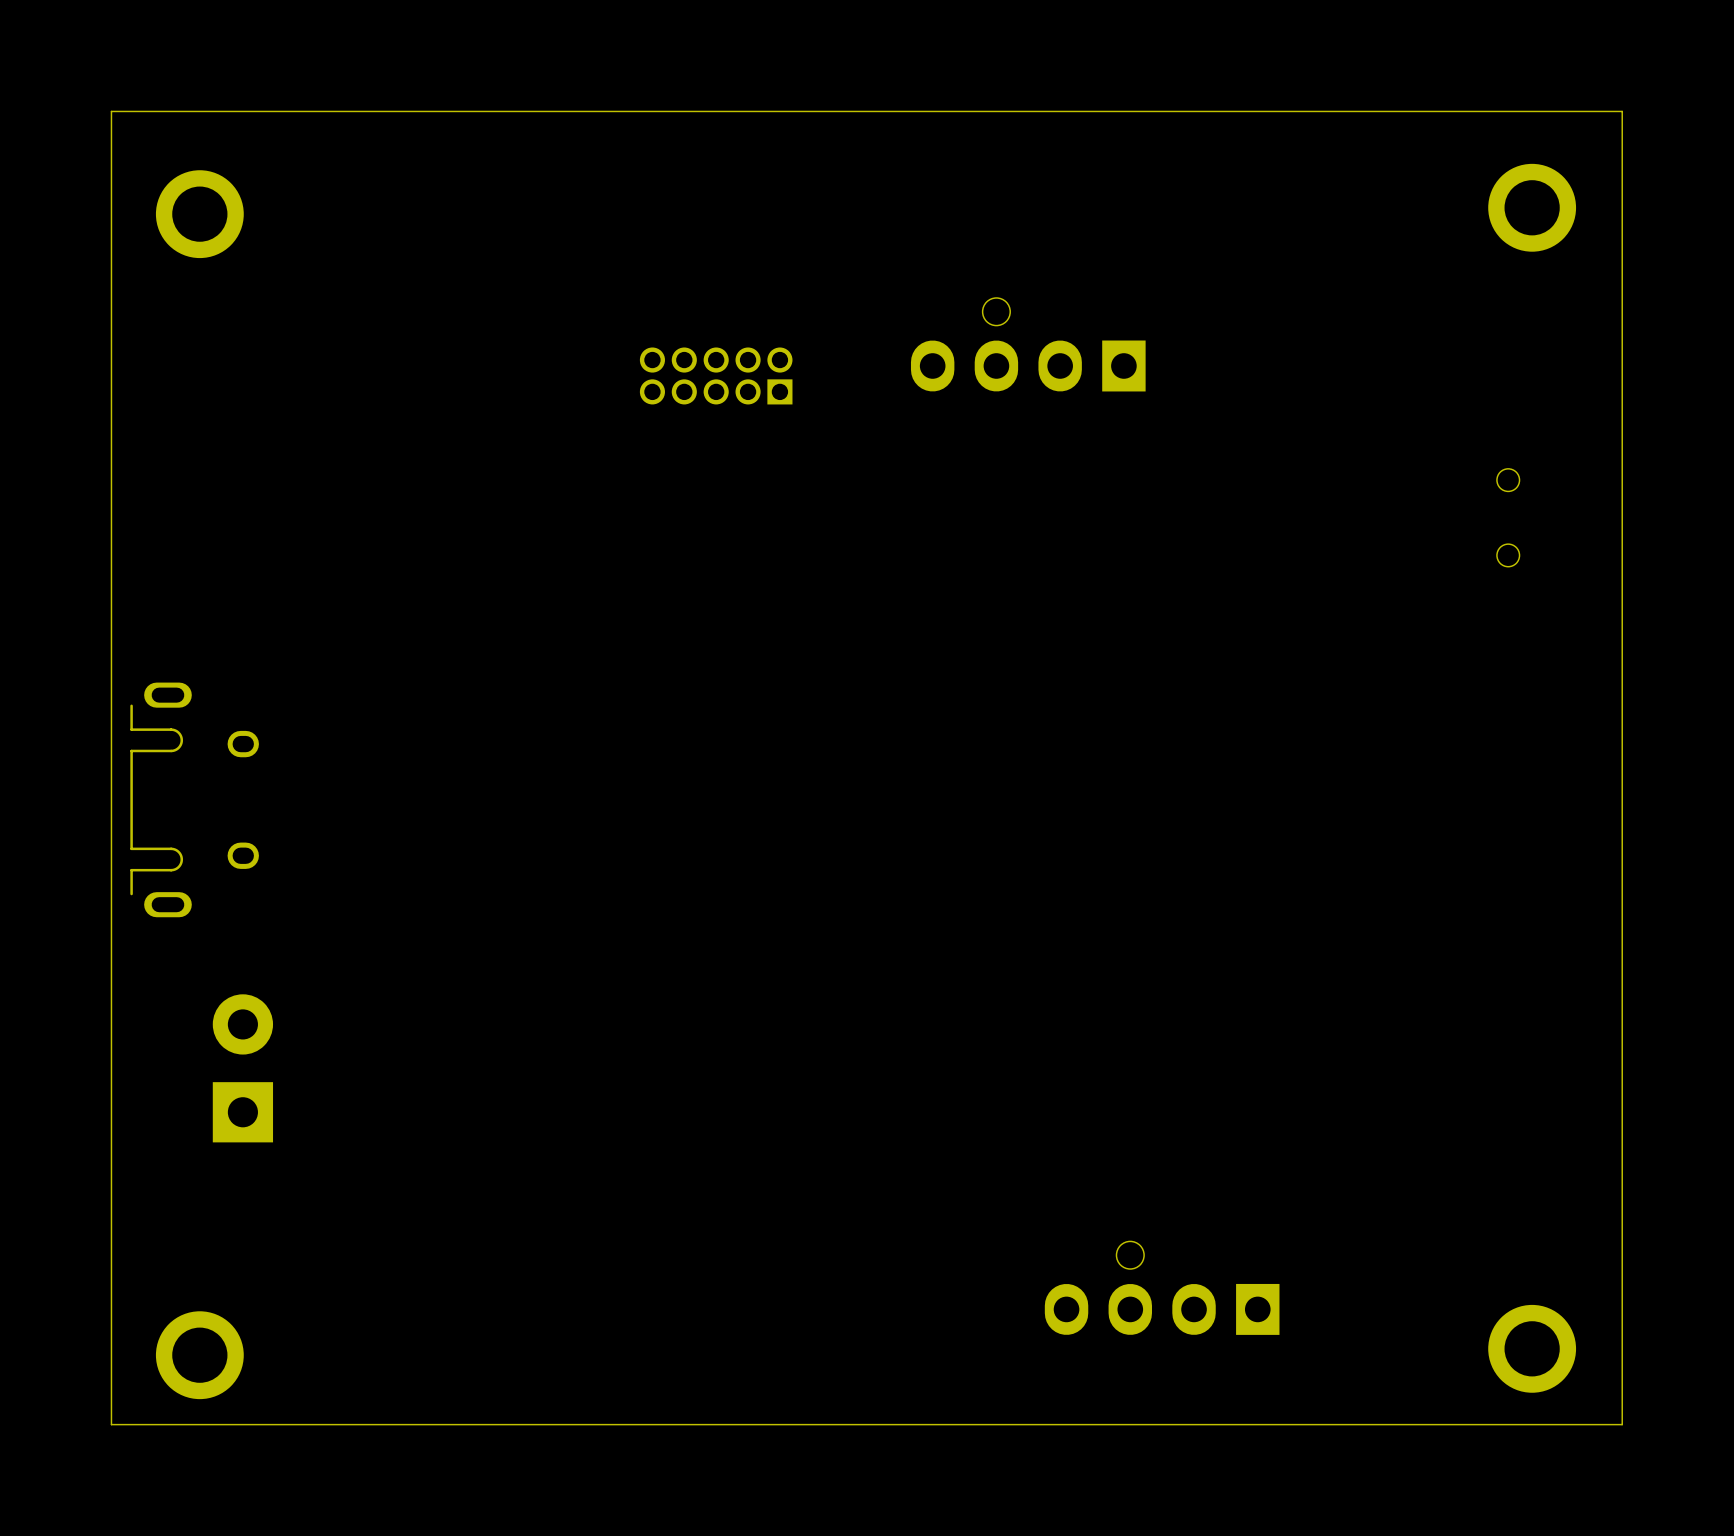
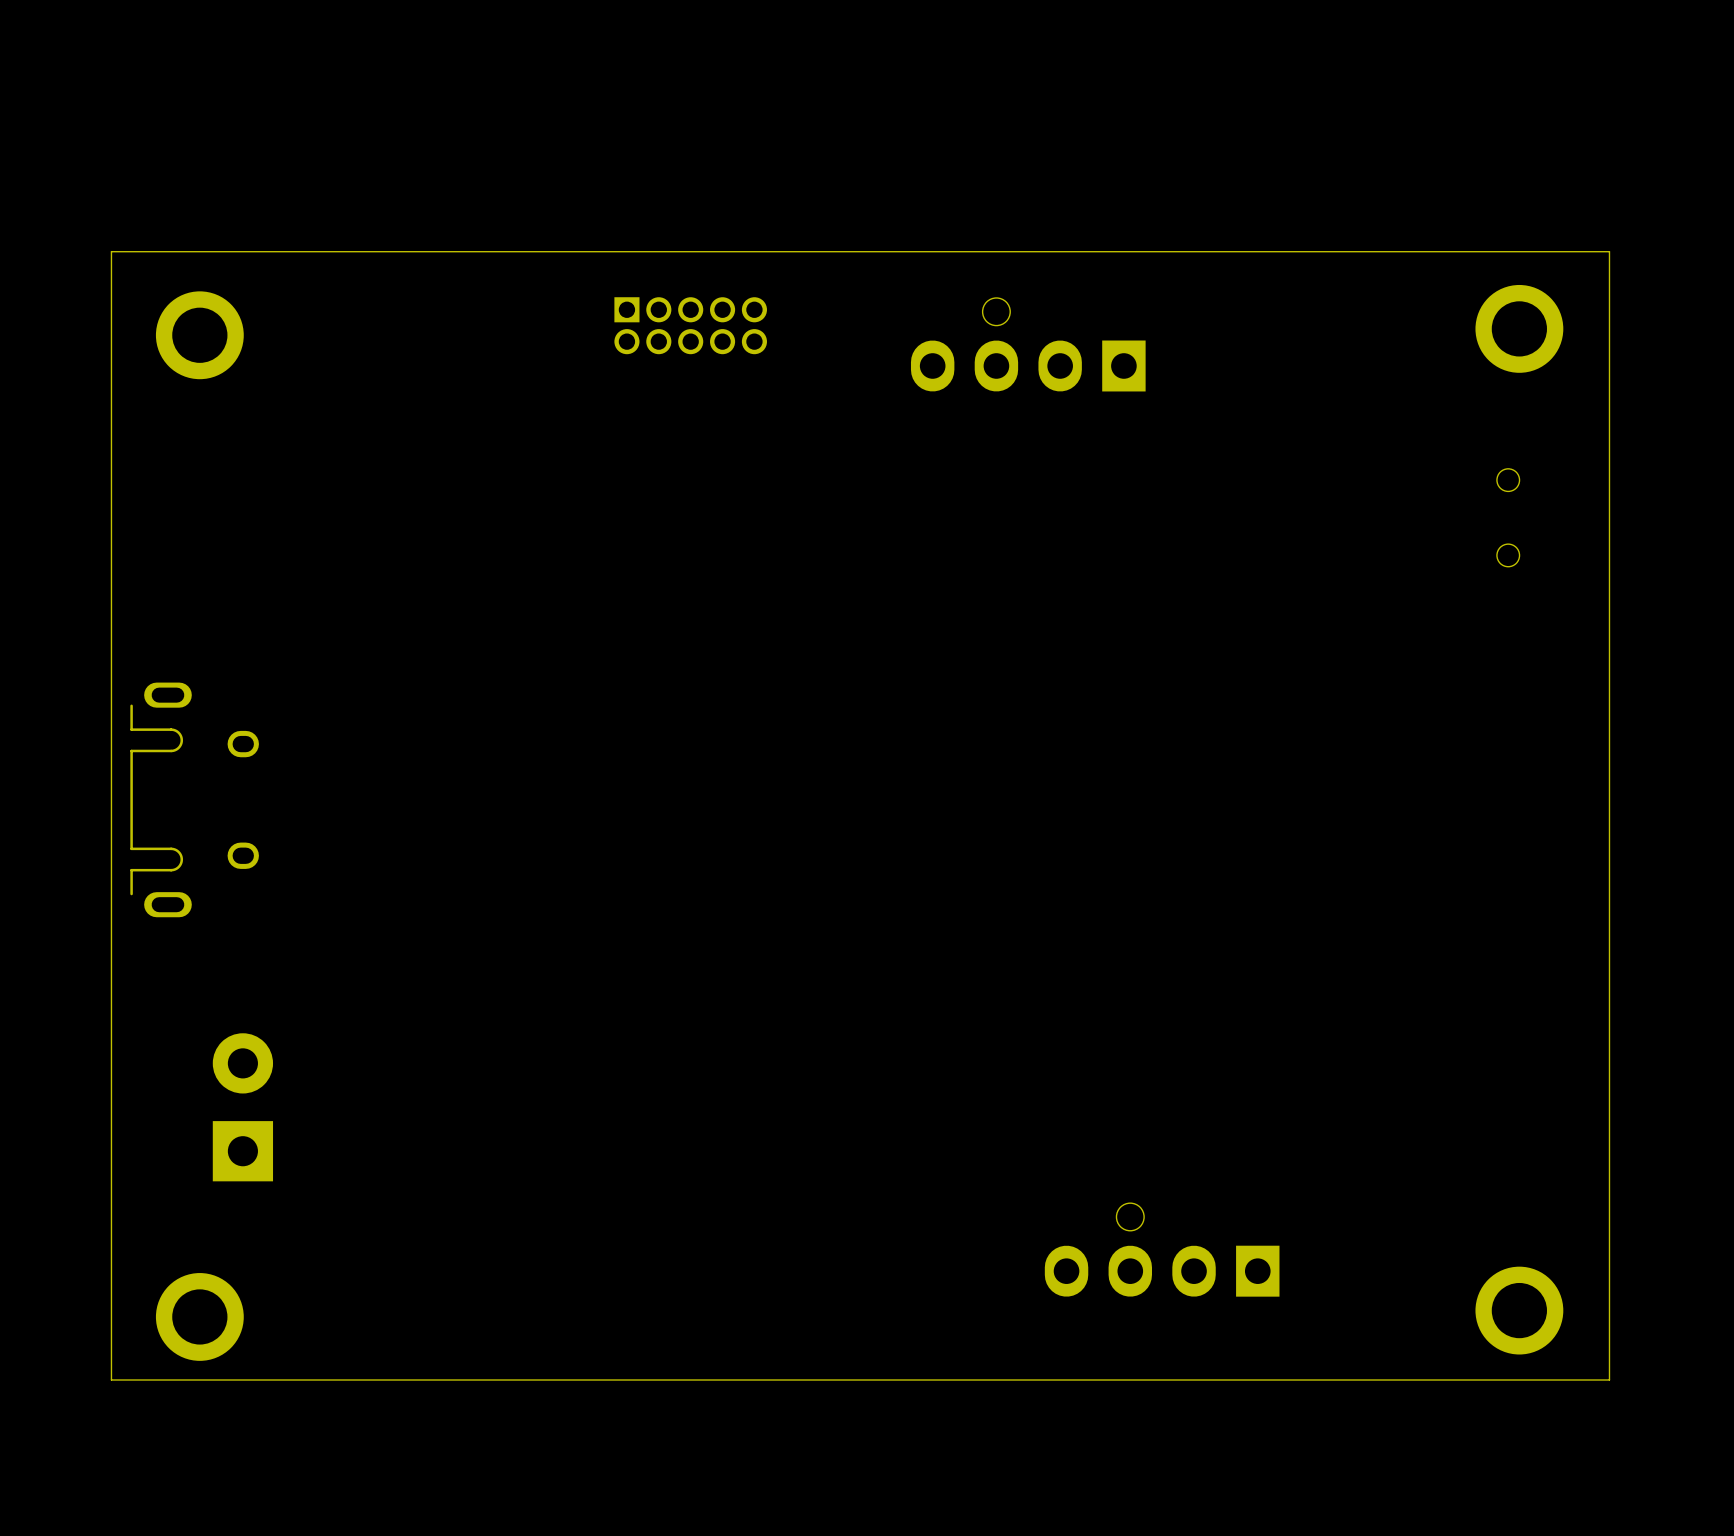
part position: (1532, 207) -> (1519, 328)
part position: (199, 214) -> (199, 335)
board edge: (111, 251) (111, 111) (1622, 111) (1622, 1424) (111, 1424) (111, 1380) -> (111, 251) (1609, 251) (1609, 1380) (111, 1380)
part rotation: 0° (716, 375) -> 180° (690, 325)
part position: (242, 1068) -> (242, 1107)
part position: (1162, 1288) -> (1162, 1249)
part position: (1532, 1348) -> (1519, 1310)
part position: (199, 1355) -> (199, 1316)

